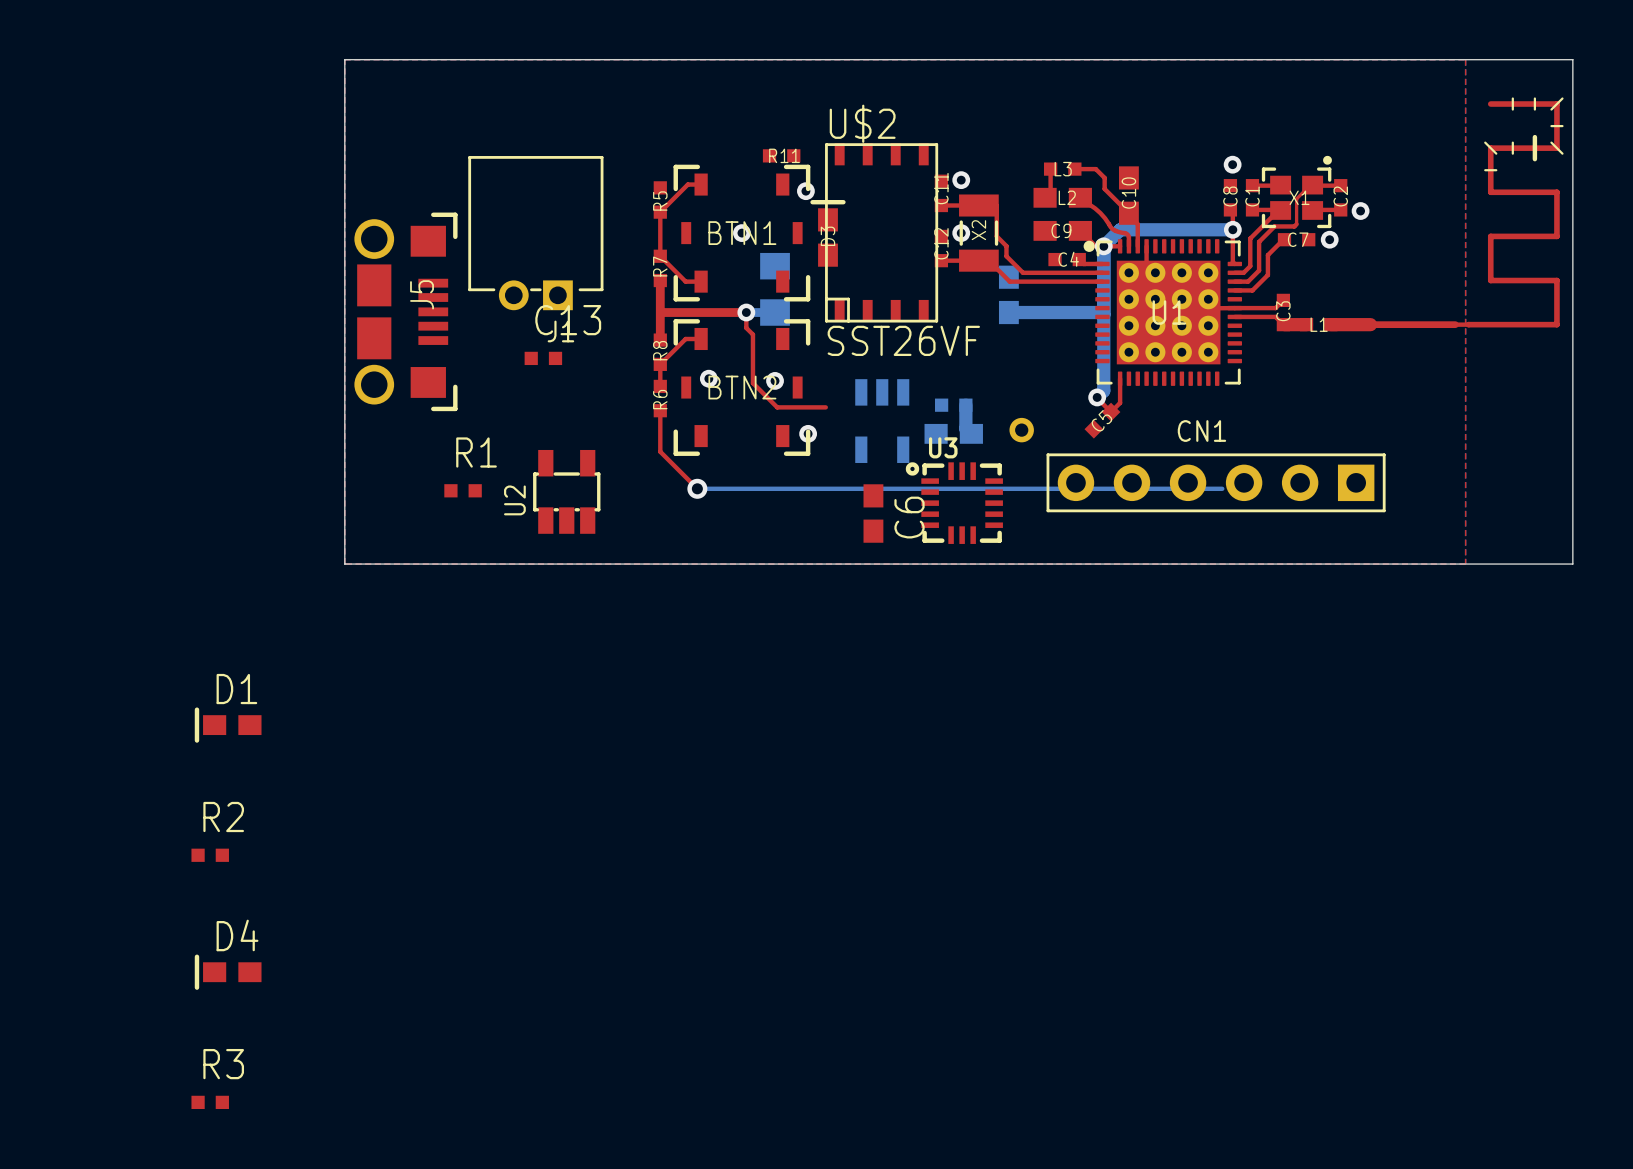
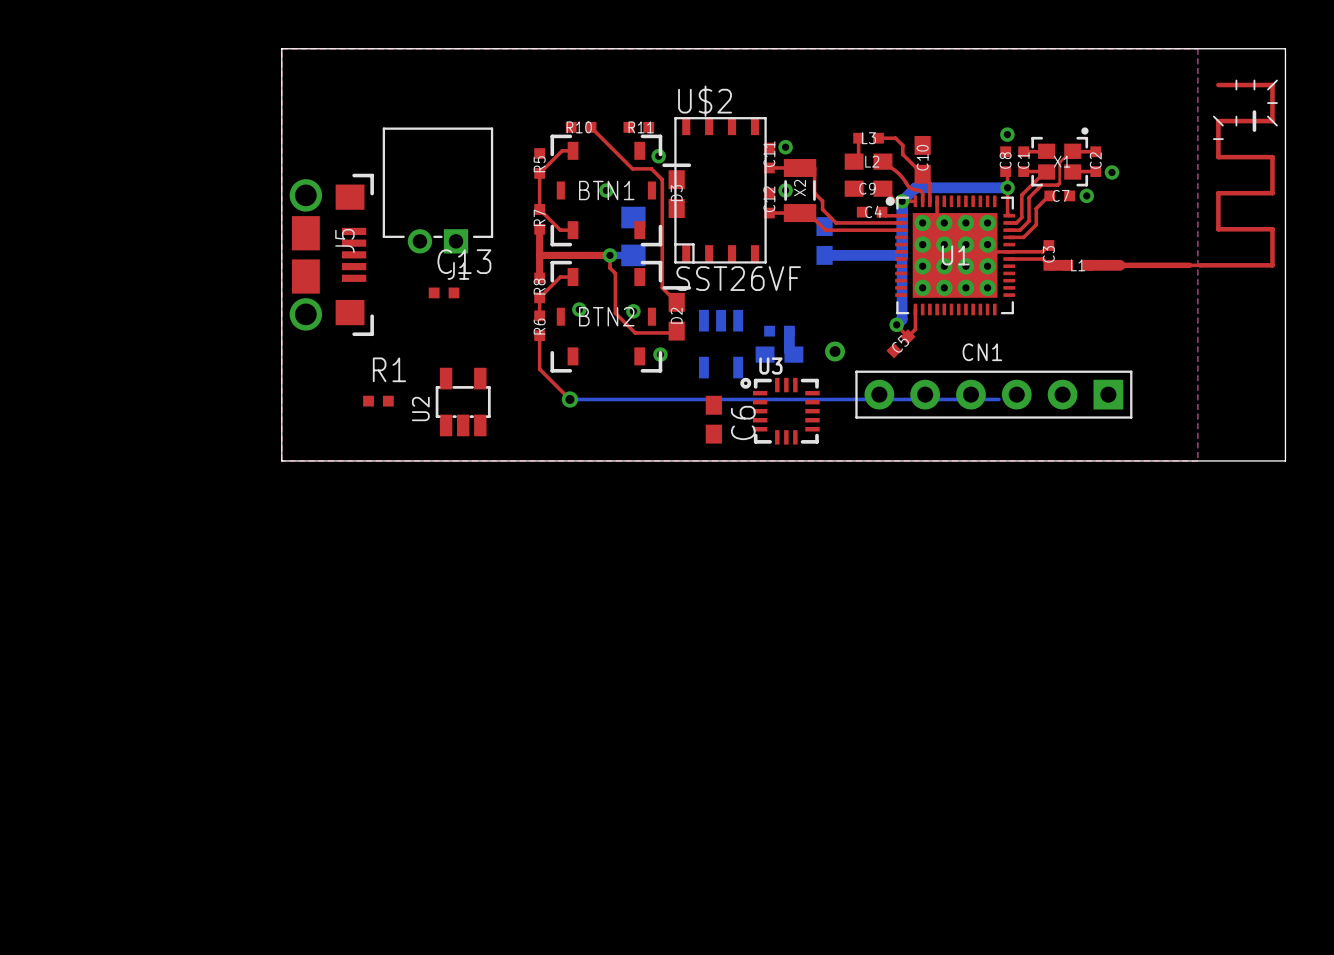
R10: none -> (581, 127)
top track: none -> (591, 127) (632, 168) (651, 168) (662, 179) (662, 287) (676, 302)
D2: none -> (676, 313)
D1: (228, 725) -> none
R2: (210, 855) -> none
D4: (228, 972) -> none
R3: (210, 1102) -> none

